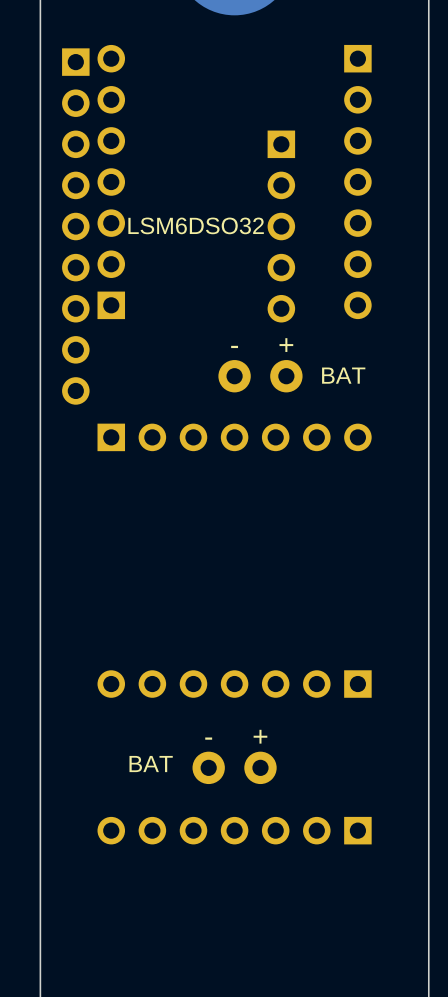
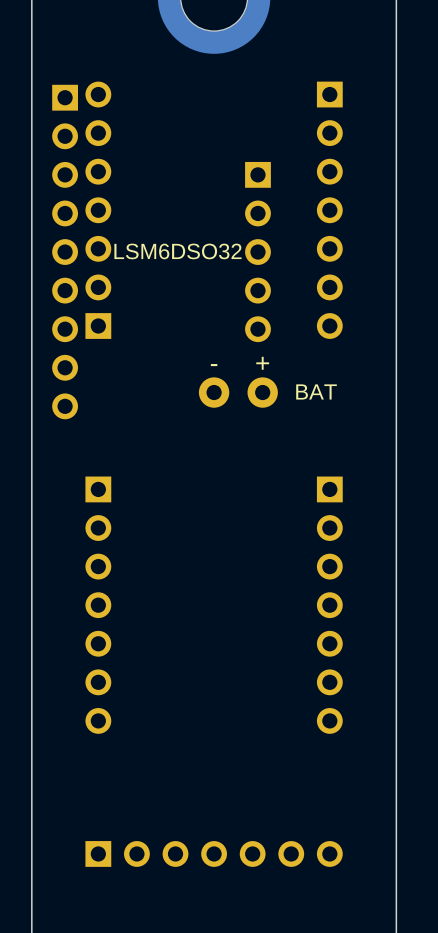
part: (234, 437) -> none
part: none -> (98, 605)
part: none -> (329, 605)
part: (234, 684) -> none
text: + (260, 736) -> none
text: - (208, 738) -> none
text: BAT (151, 764) -> none
part: (208, 767) -> none
part: (260, 767) -> none
part rotation: 0° (234, 830) -> 180° (214, 853)

